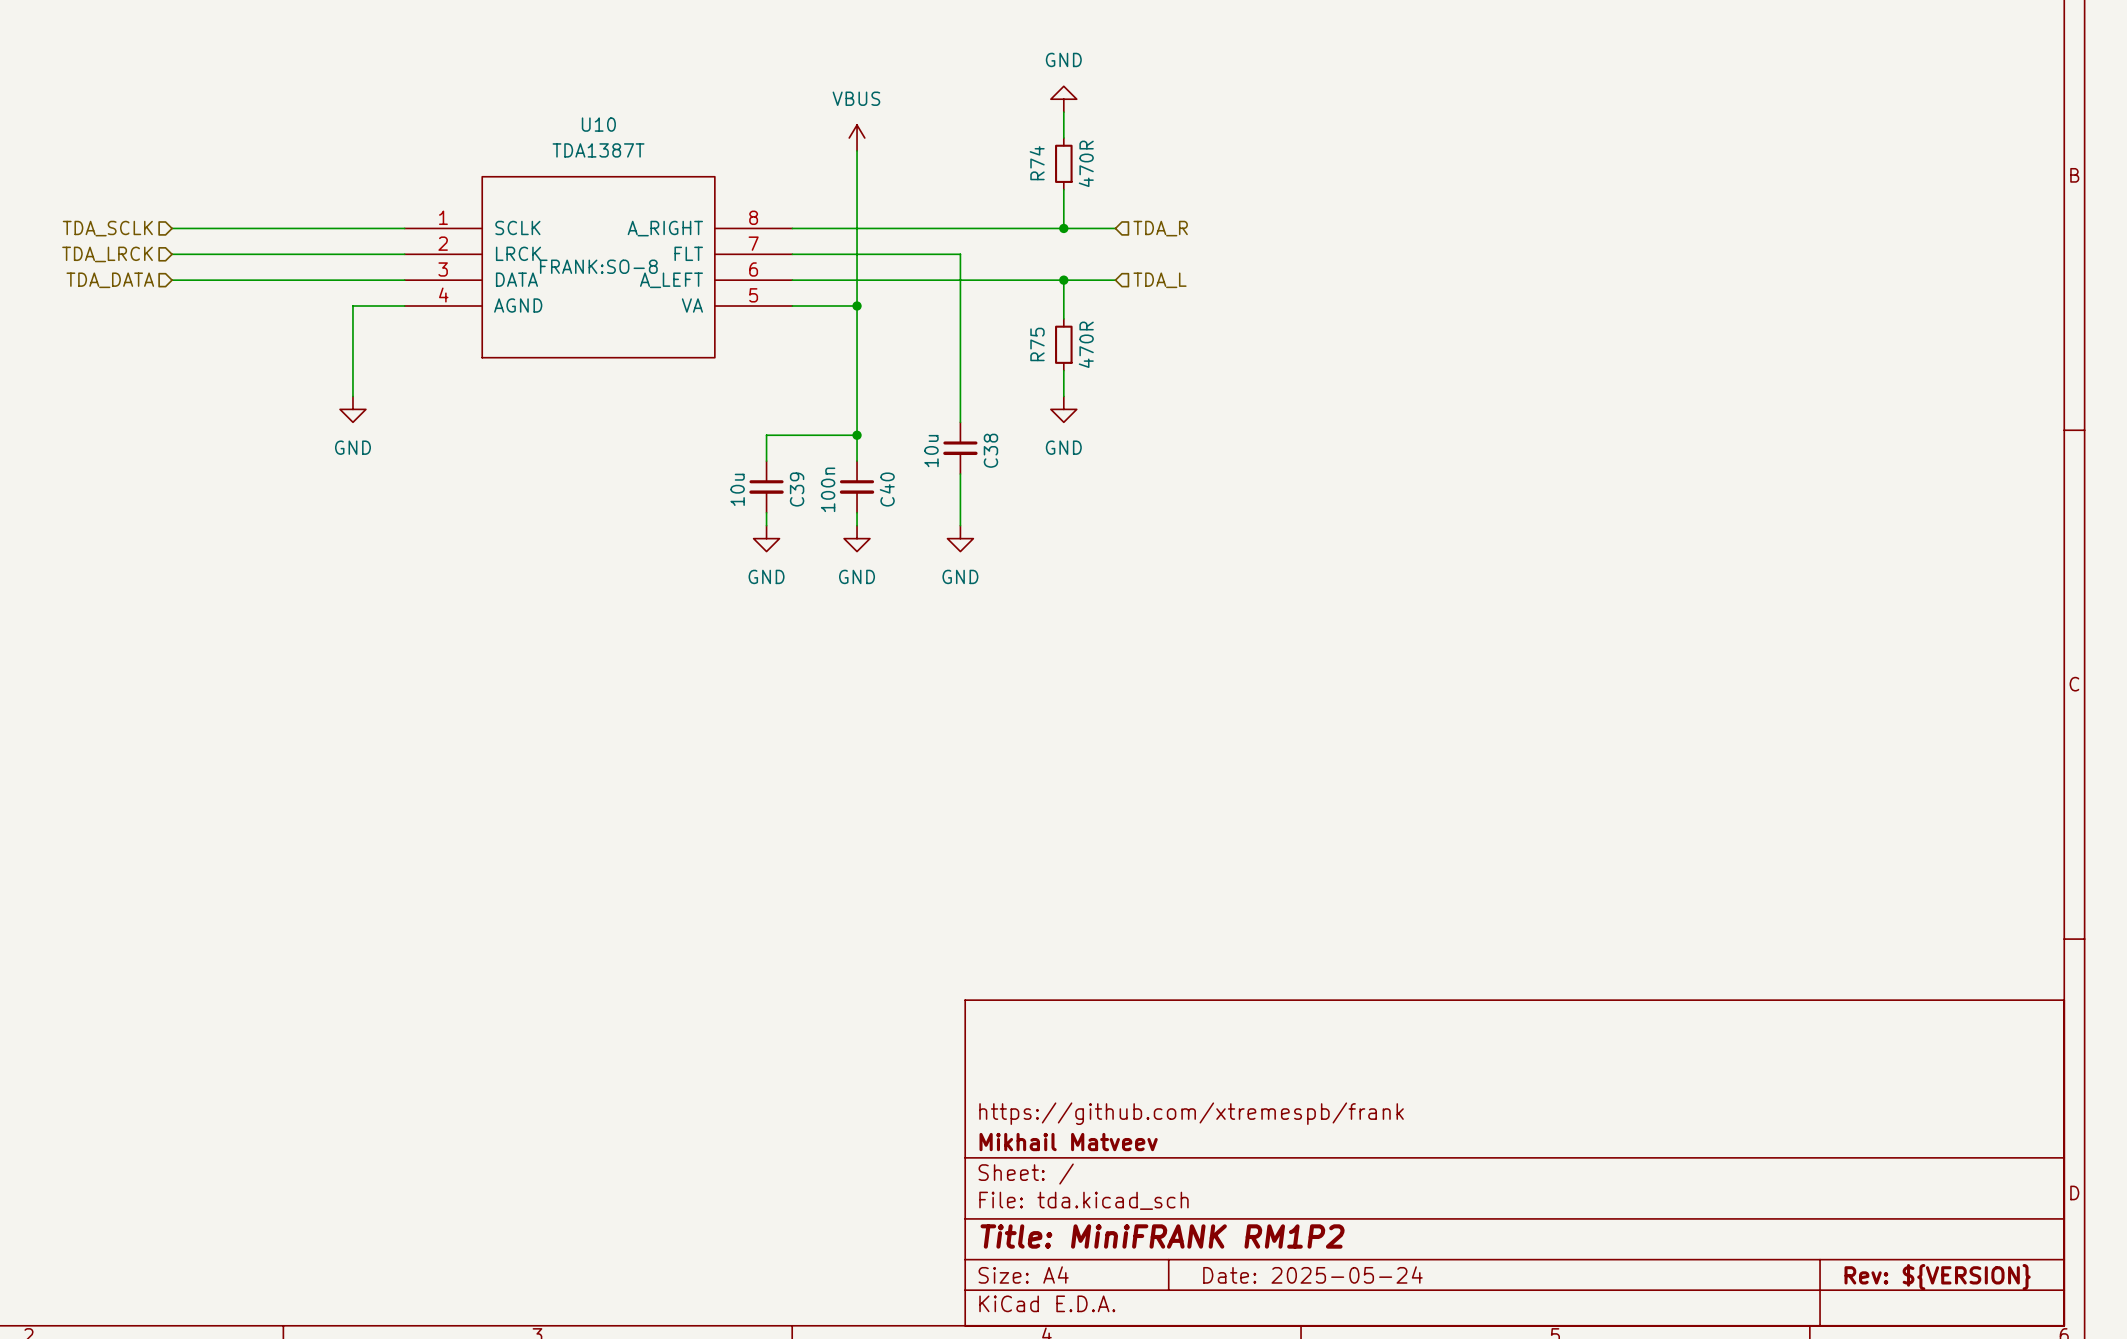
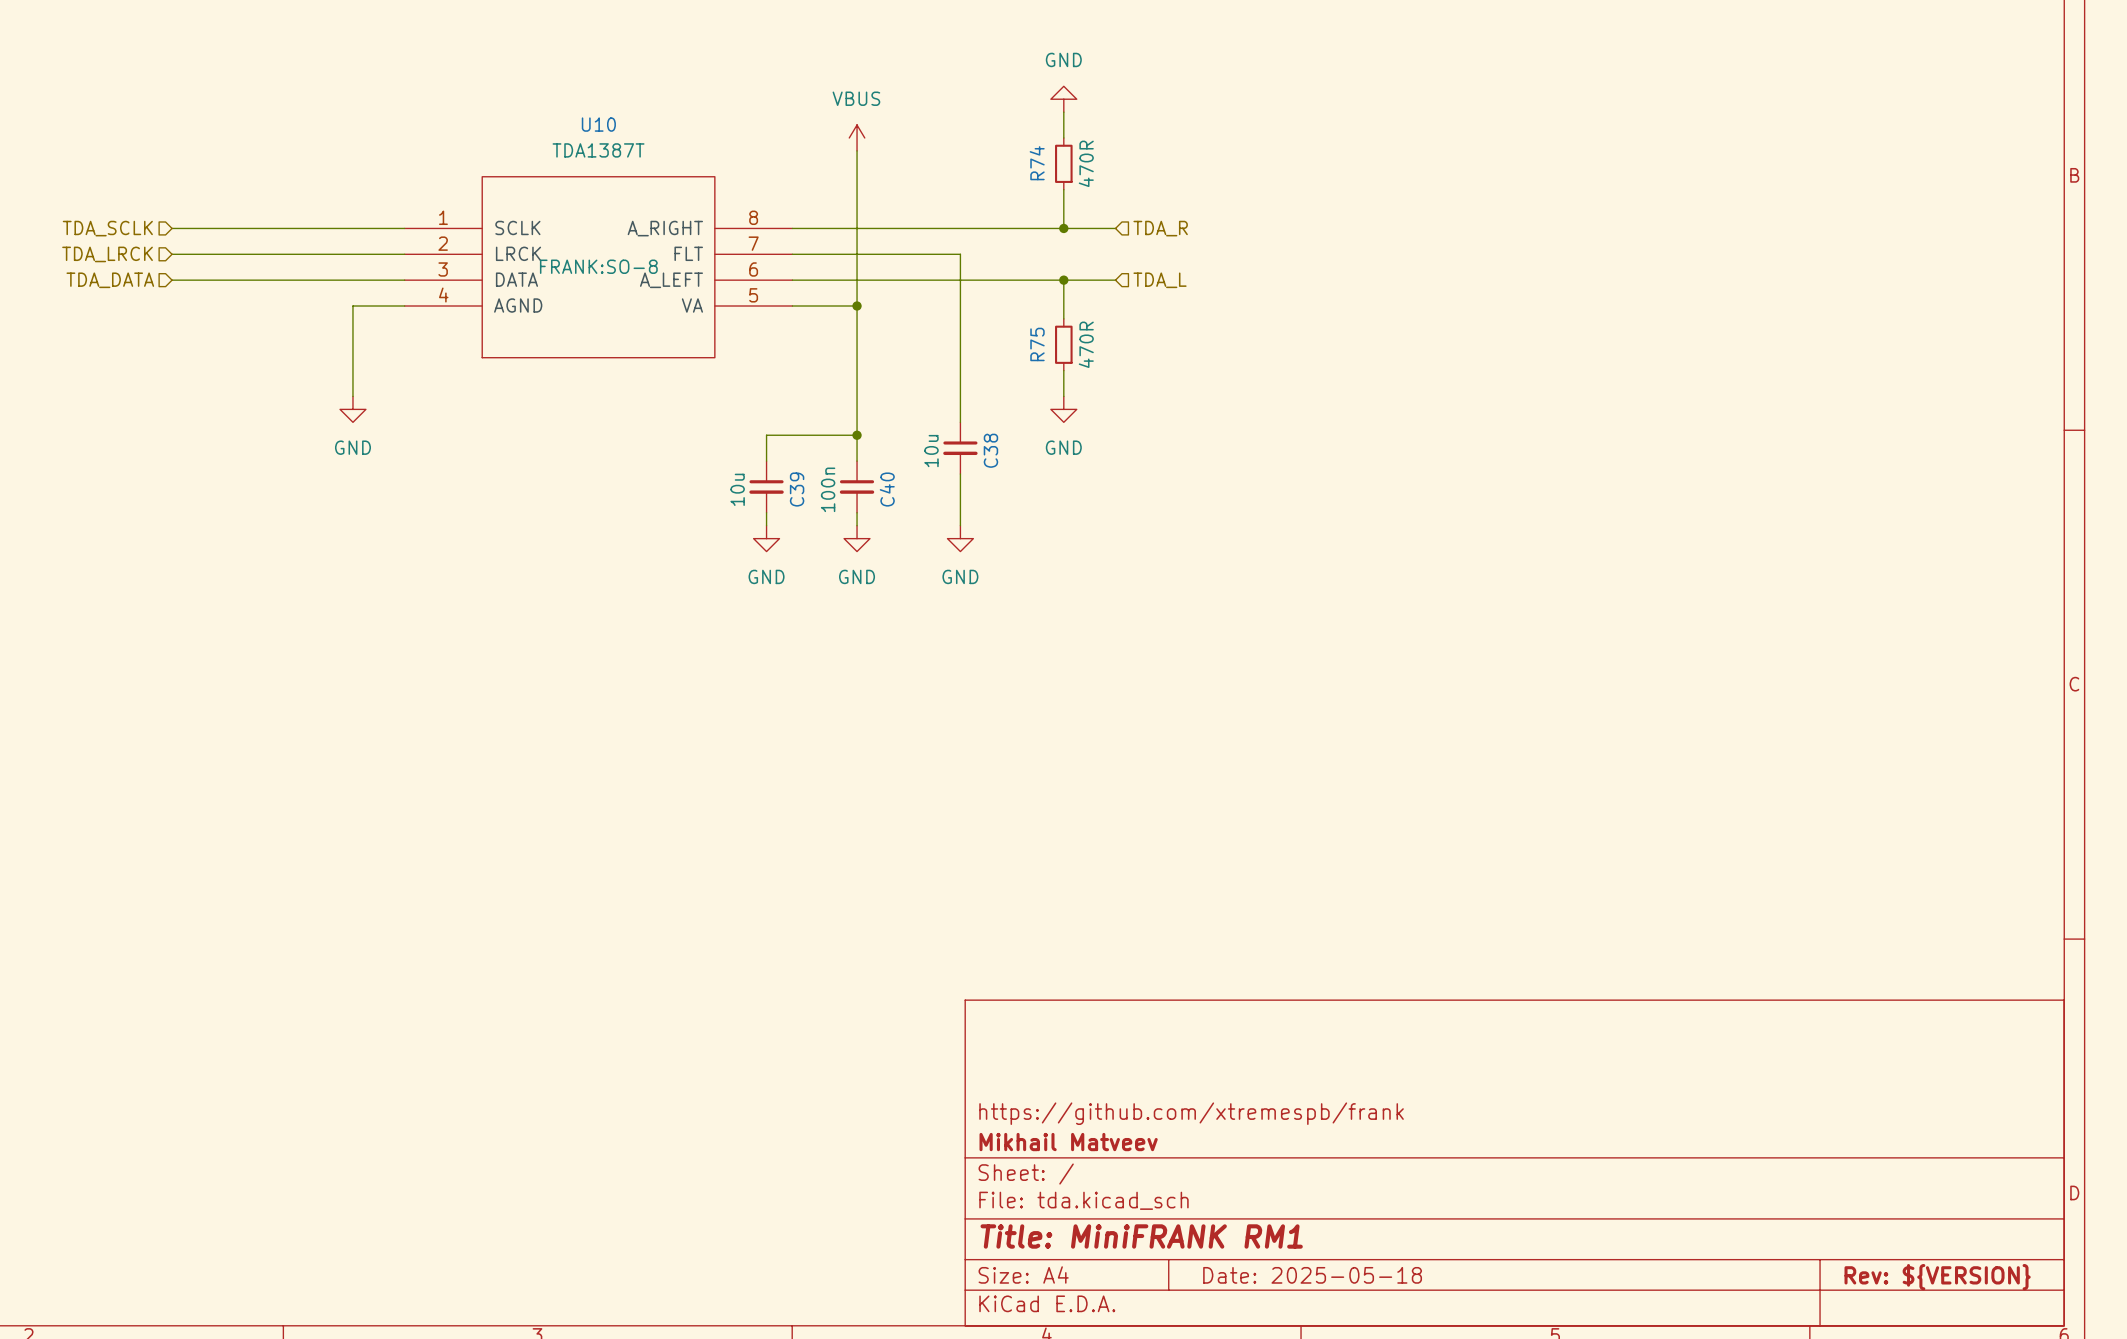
title block: Title: MiniFRANK RM1P2 (1162, 1236) -> Title: MiniFRANK RM1 (1141, 1236)
title block: Date: 2025-05-24 (1312, 1274) -> Date: 2025-05-18 (1312, 1275)

